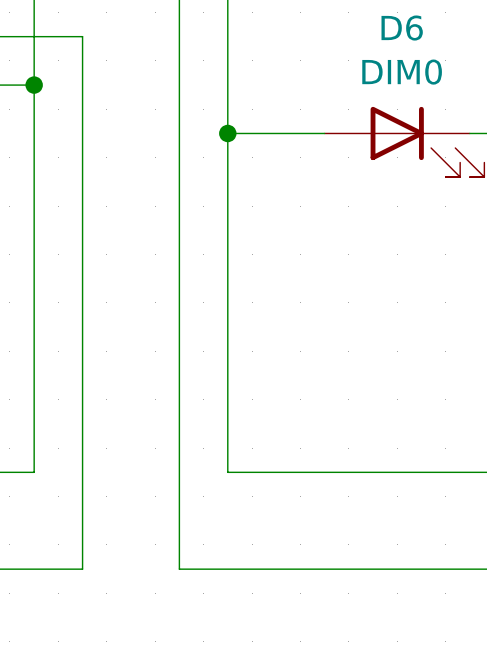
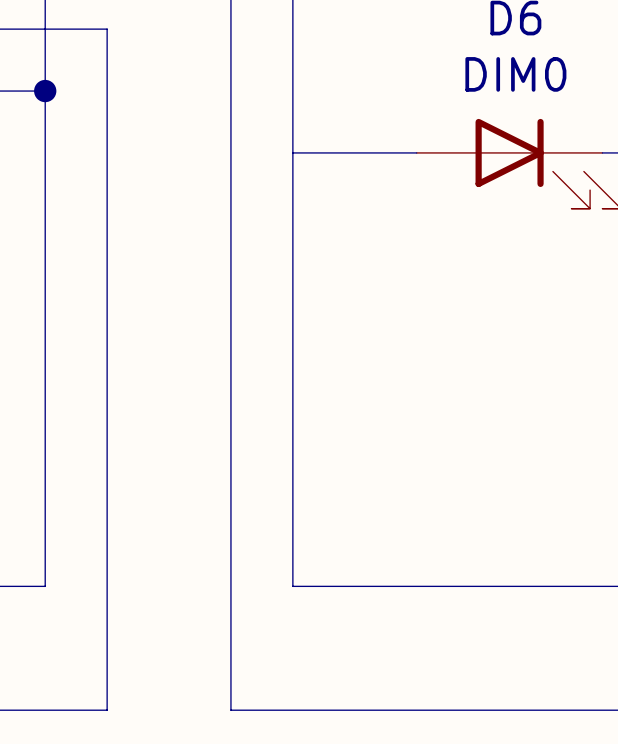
junction: (227, 133) -> none

